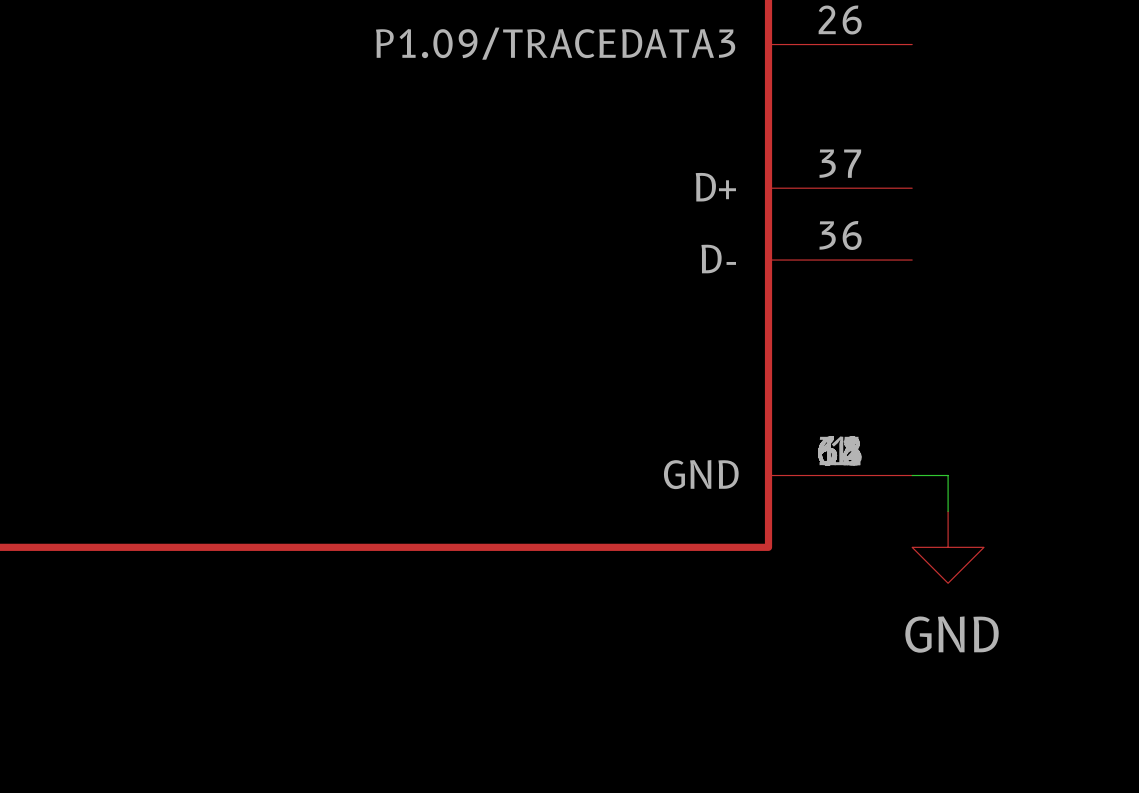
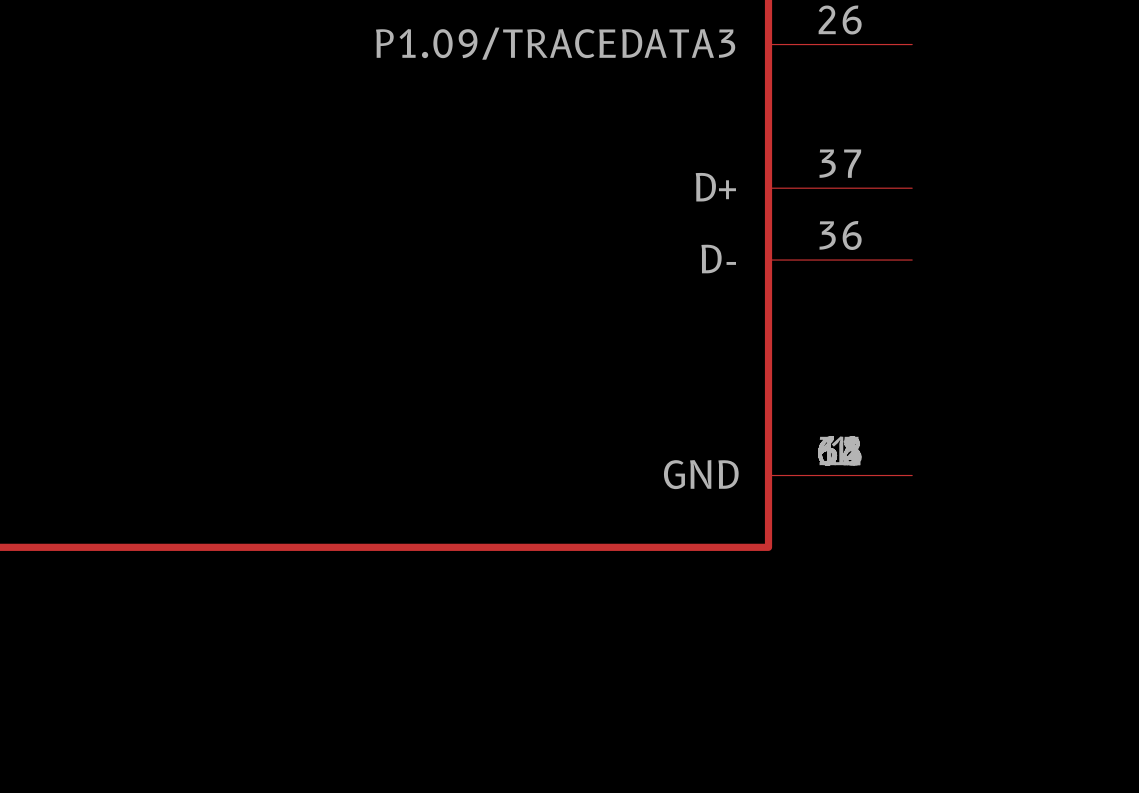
wire: (912, 475) (948, 475) (948, 511) -> none
power symbol: GND (948, 547) -> none

